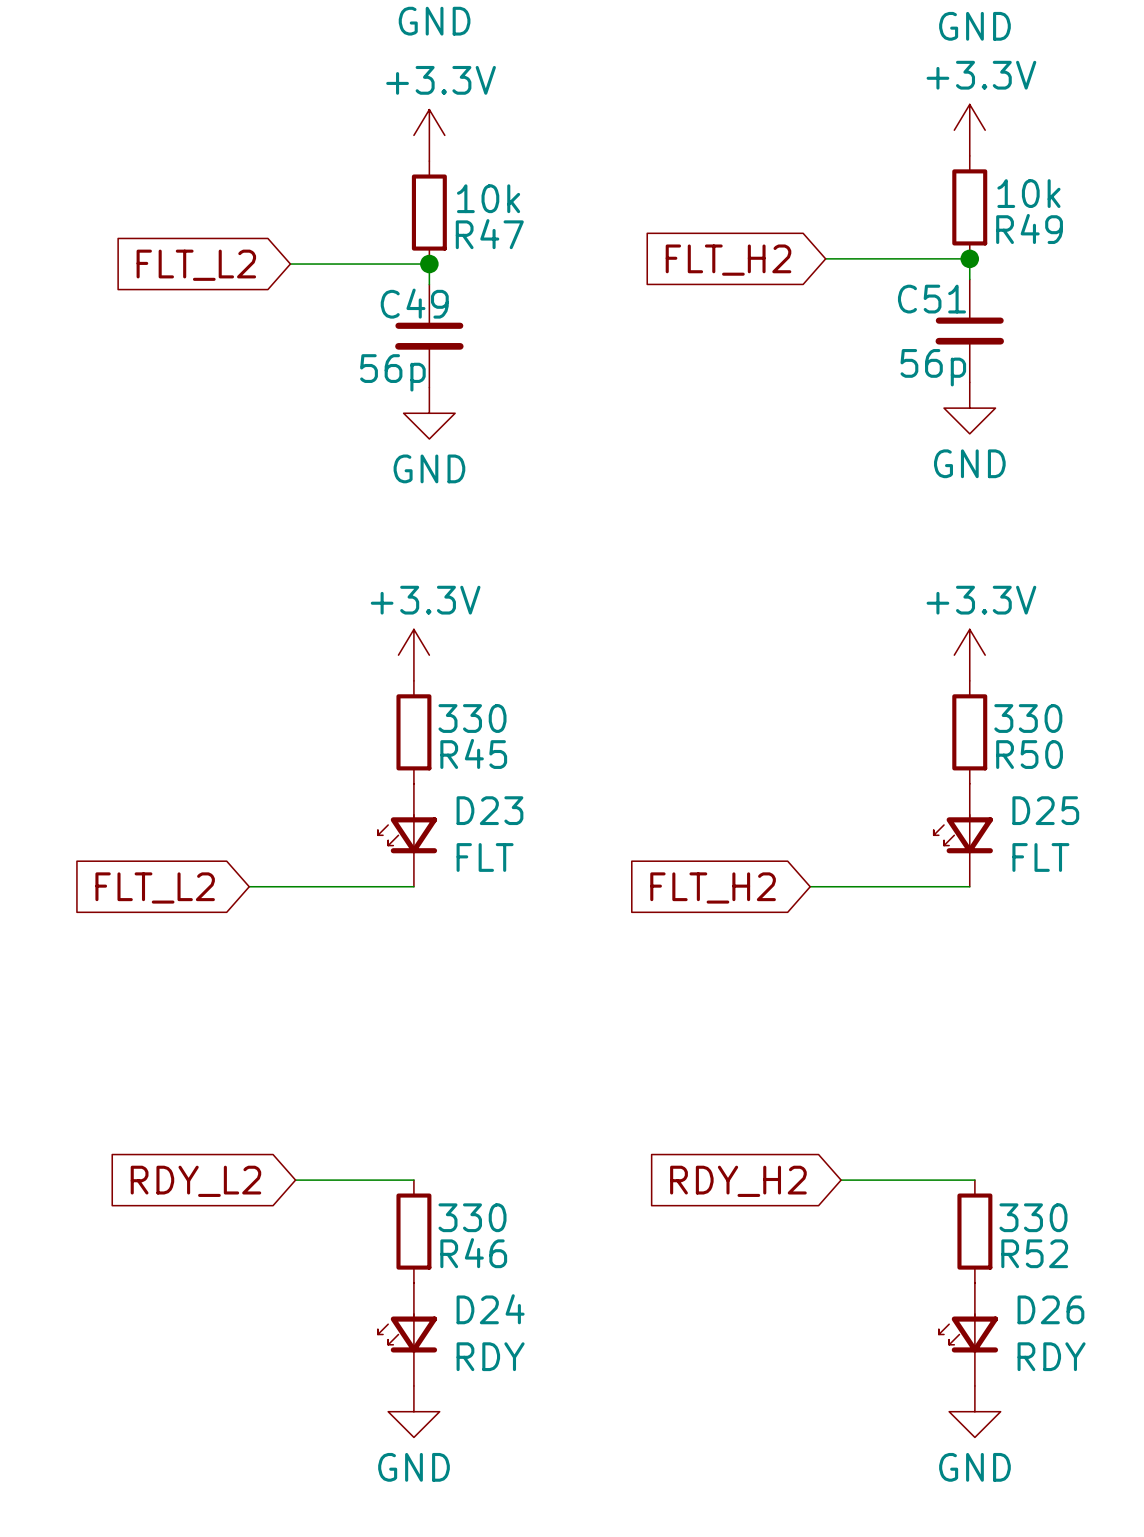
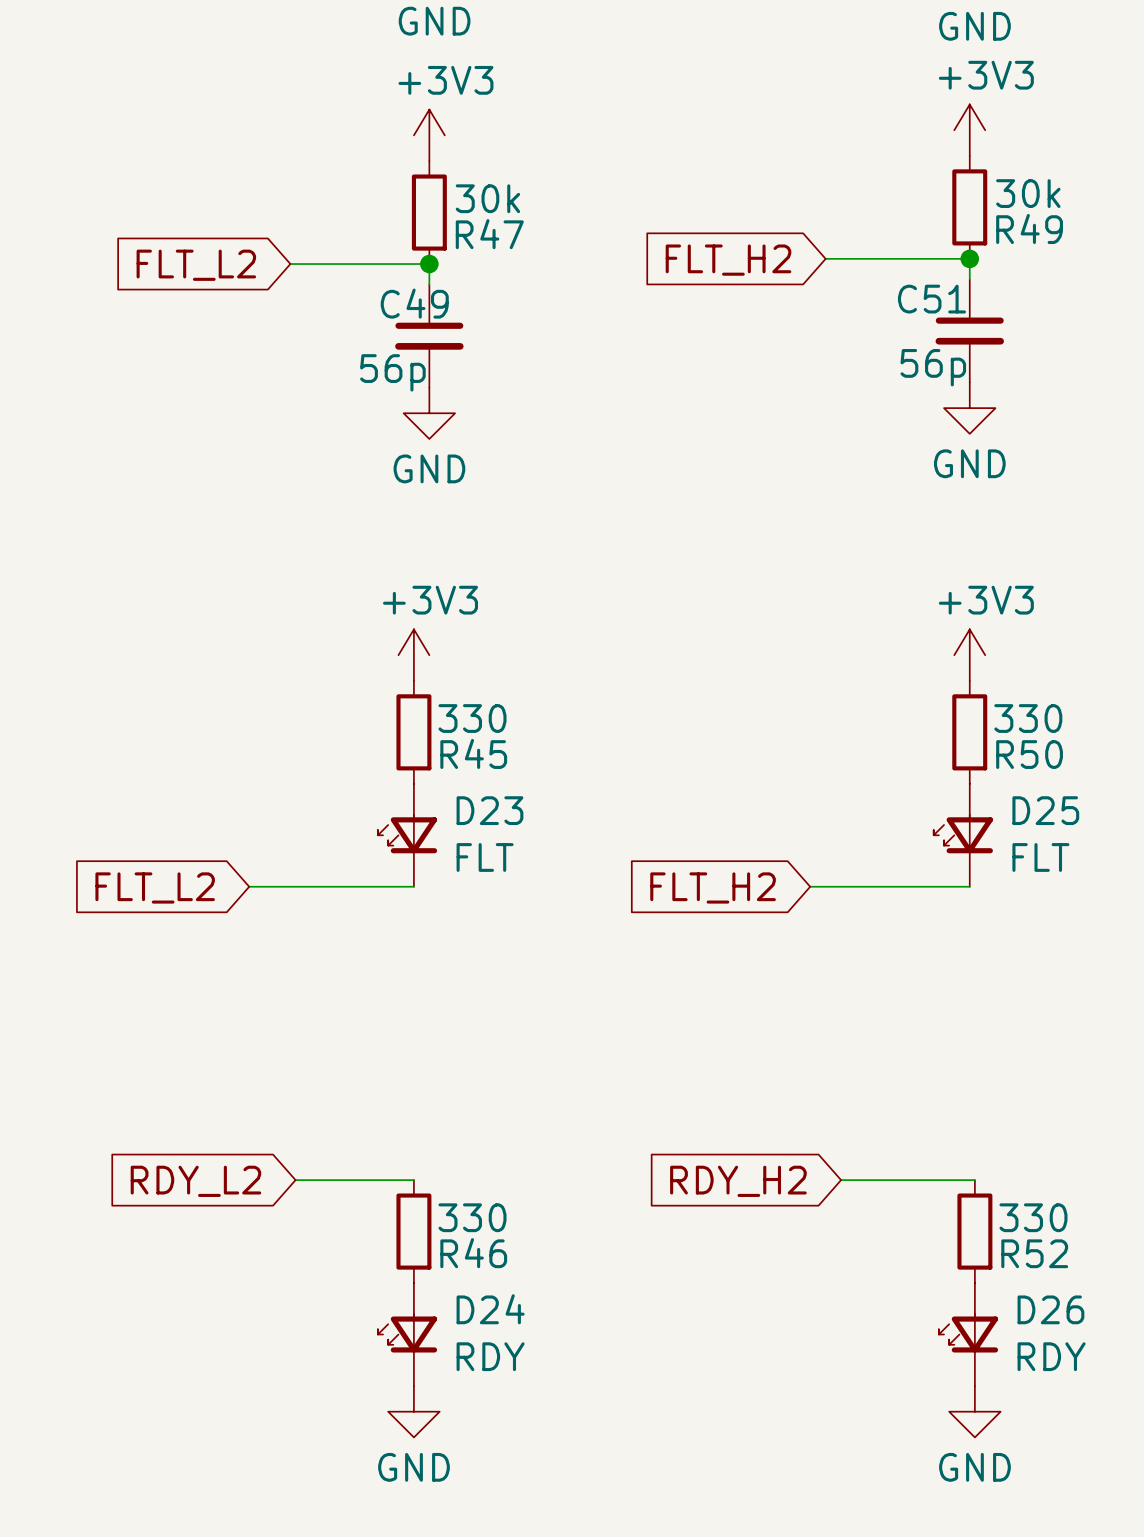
power symbol: +3.3V (969, 130) -> +3V3 (969, 130)
power symbol: +3.3V (429, 135) -> +3V3 (429, 135)
R49 value: 10k (1028, 193) -> 30k (1028, 193)
R47 value: 10k (488, 198) -> 30k (487, 198)
power symbol: +3.3V (413, 655) -> +3V3 (413, 655)
power symbol: +3.3V (969, 655) -> +3V3 (969, 655)

